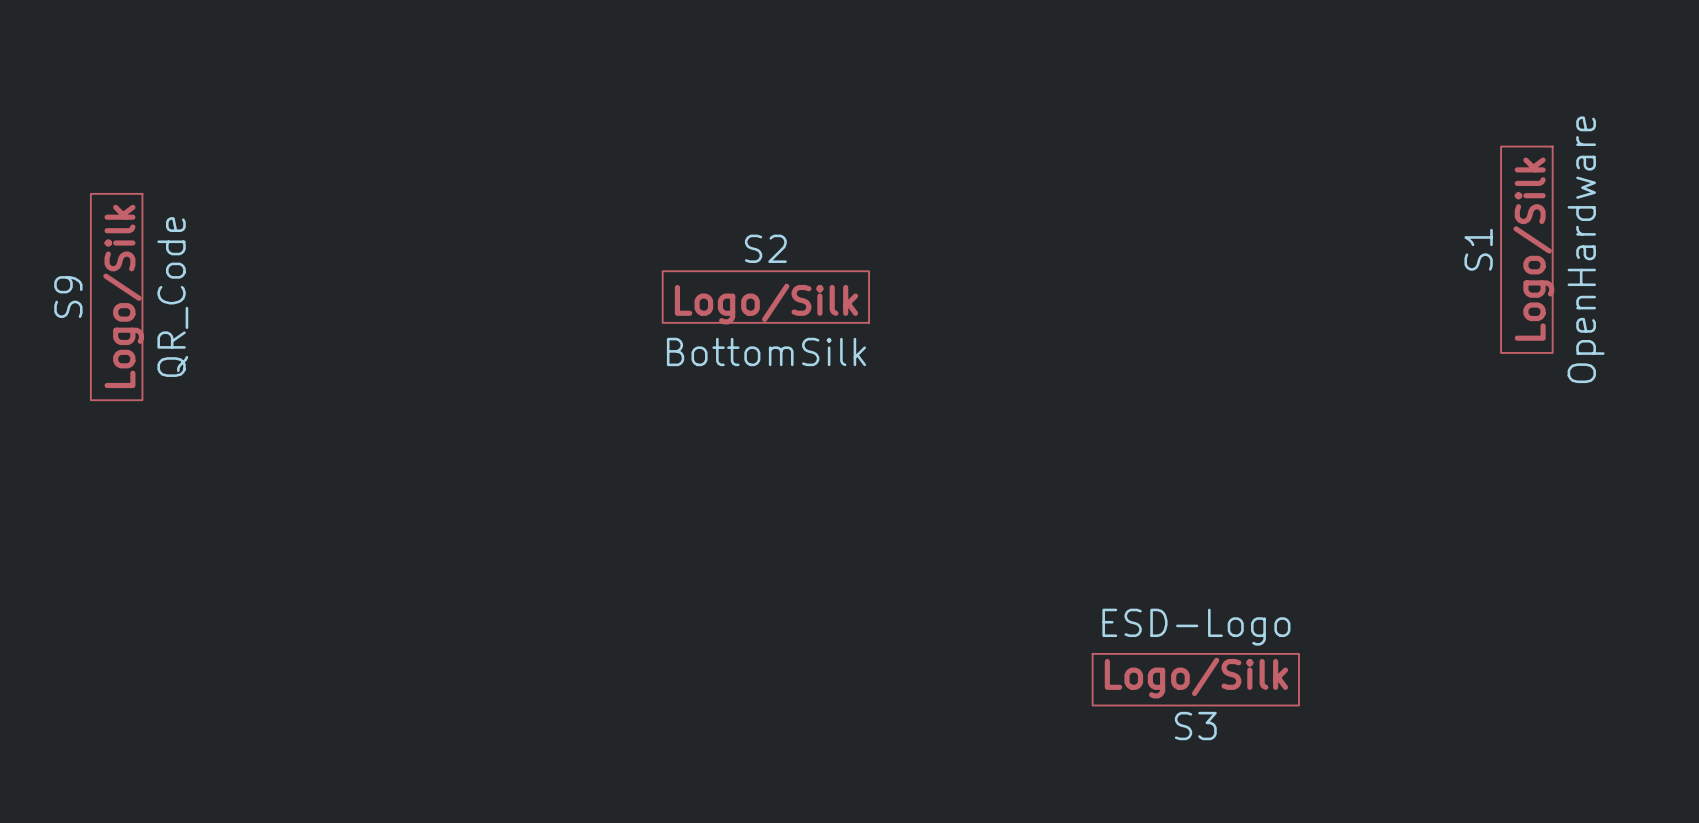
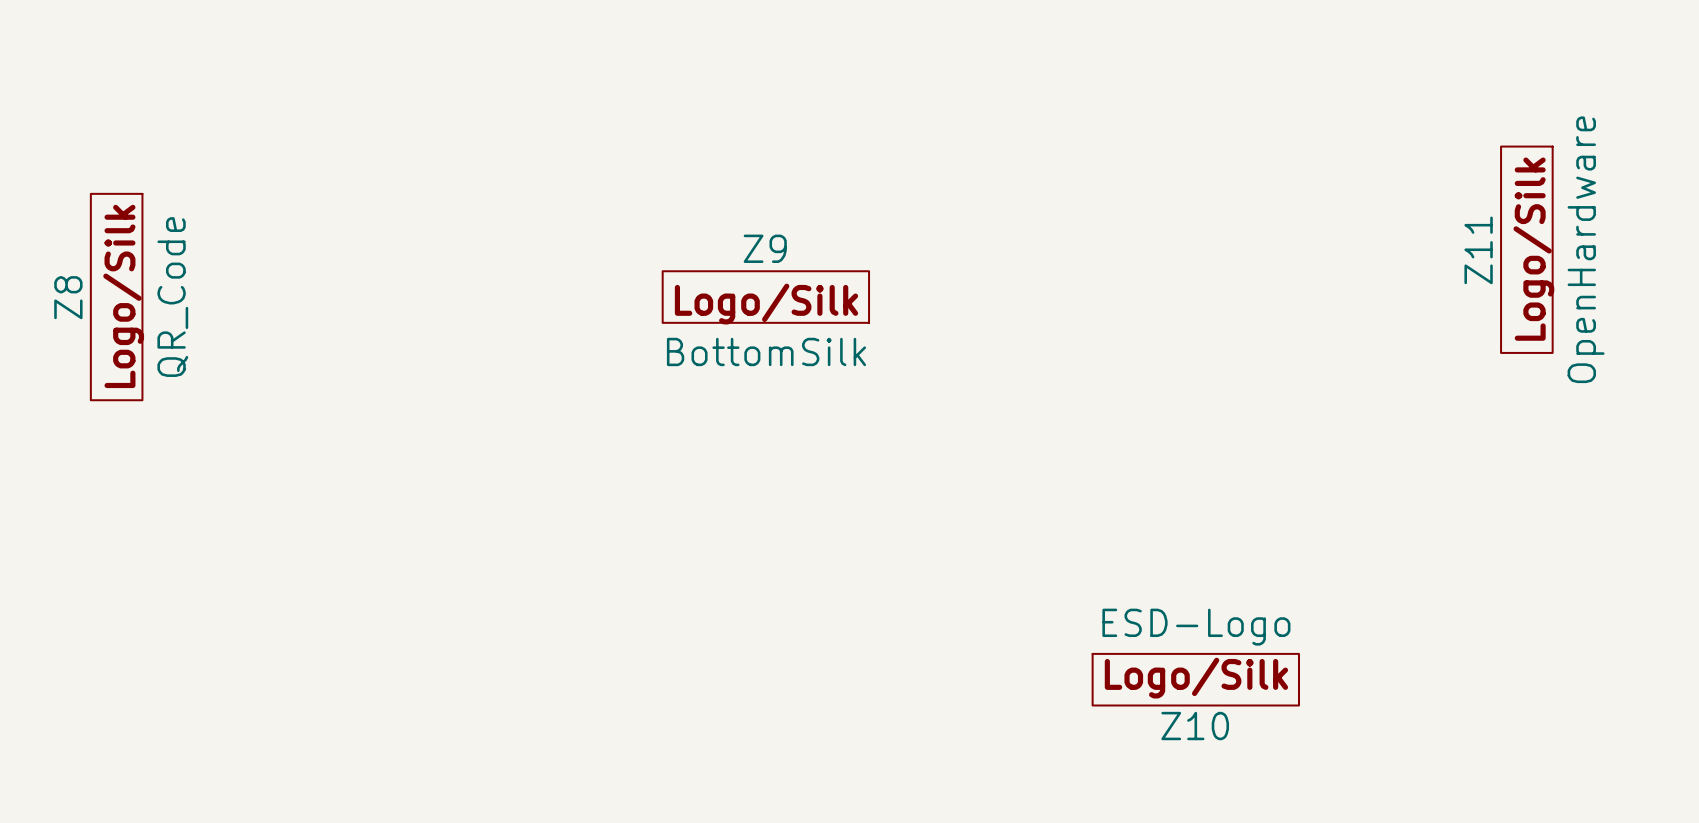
S2 name: S2 (765, 248) -> Z9 (765, 248)
S1 name: S1 (1478, 249) -> Z11 (1478, 250)
S9 name: S9 (68, 297) -> Z8 (68, 297)
S3 name: S3 (1195, 726) -> Z10 (1195, 726)

